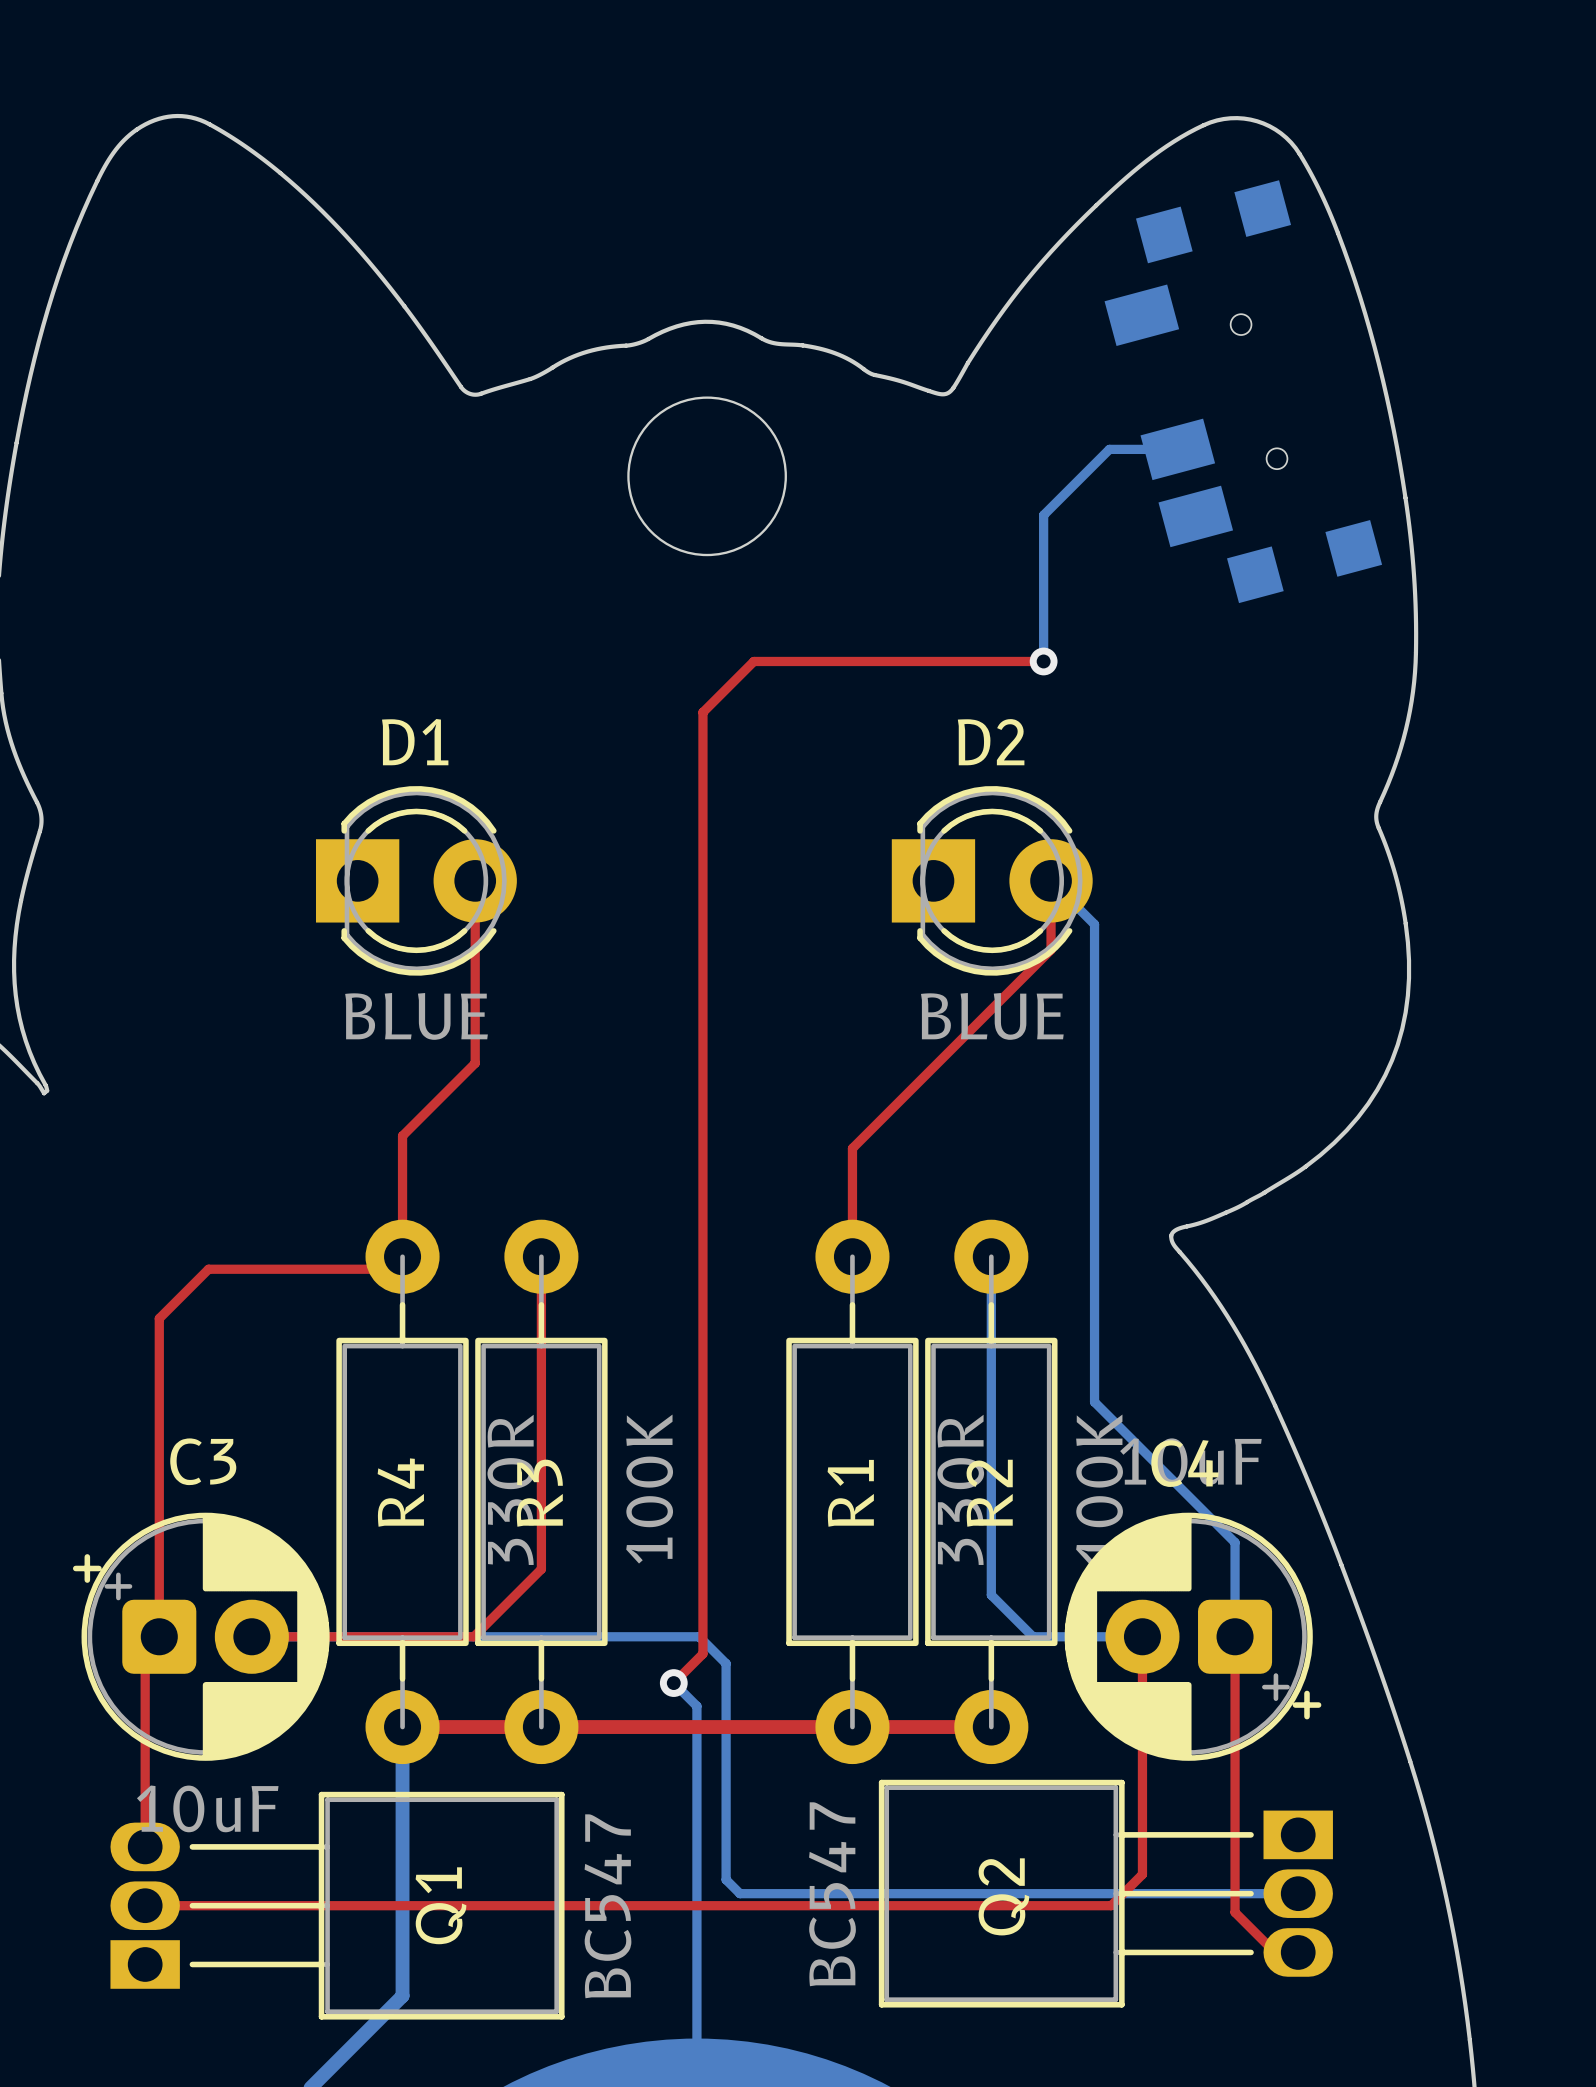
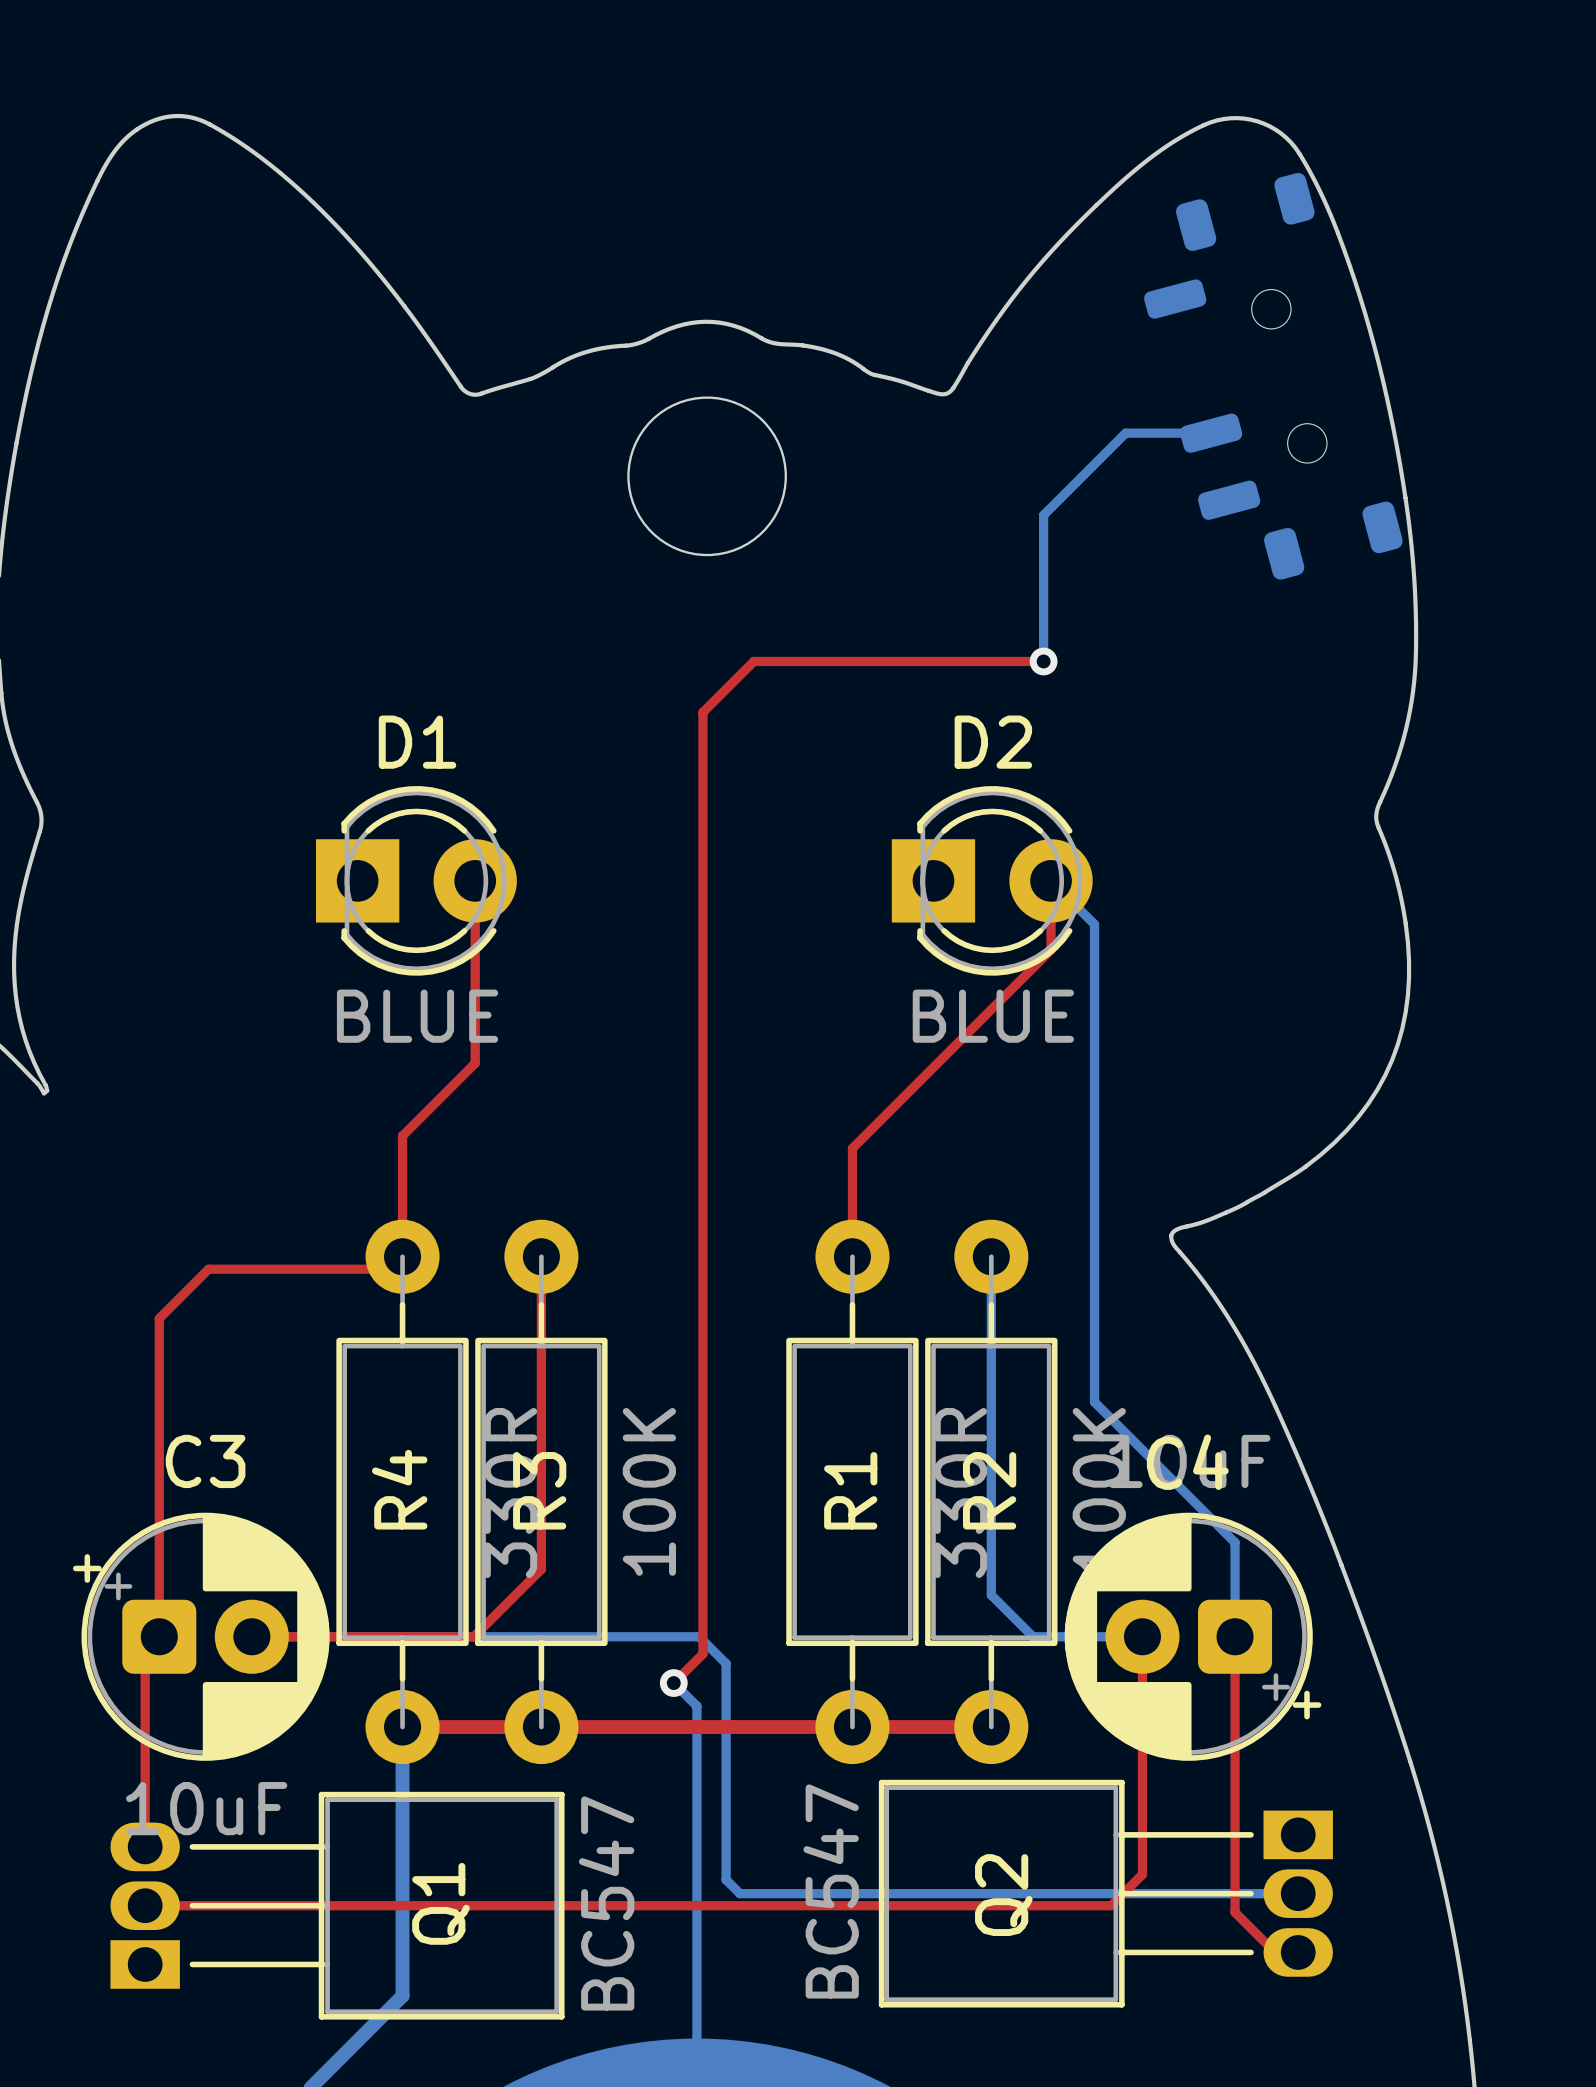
part footprint: [1104, 180, 1383, 604] -> [1144, 172, 1403, 580]
bottom track: (1109, 449) (1177, 449) -> (1109, 449) (1125, 433) (1211, 433)

